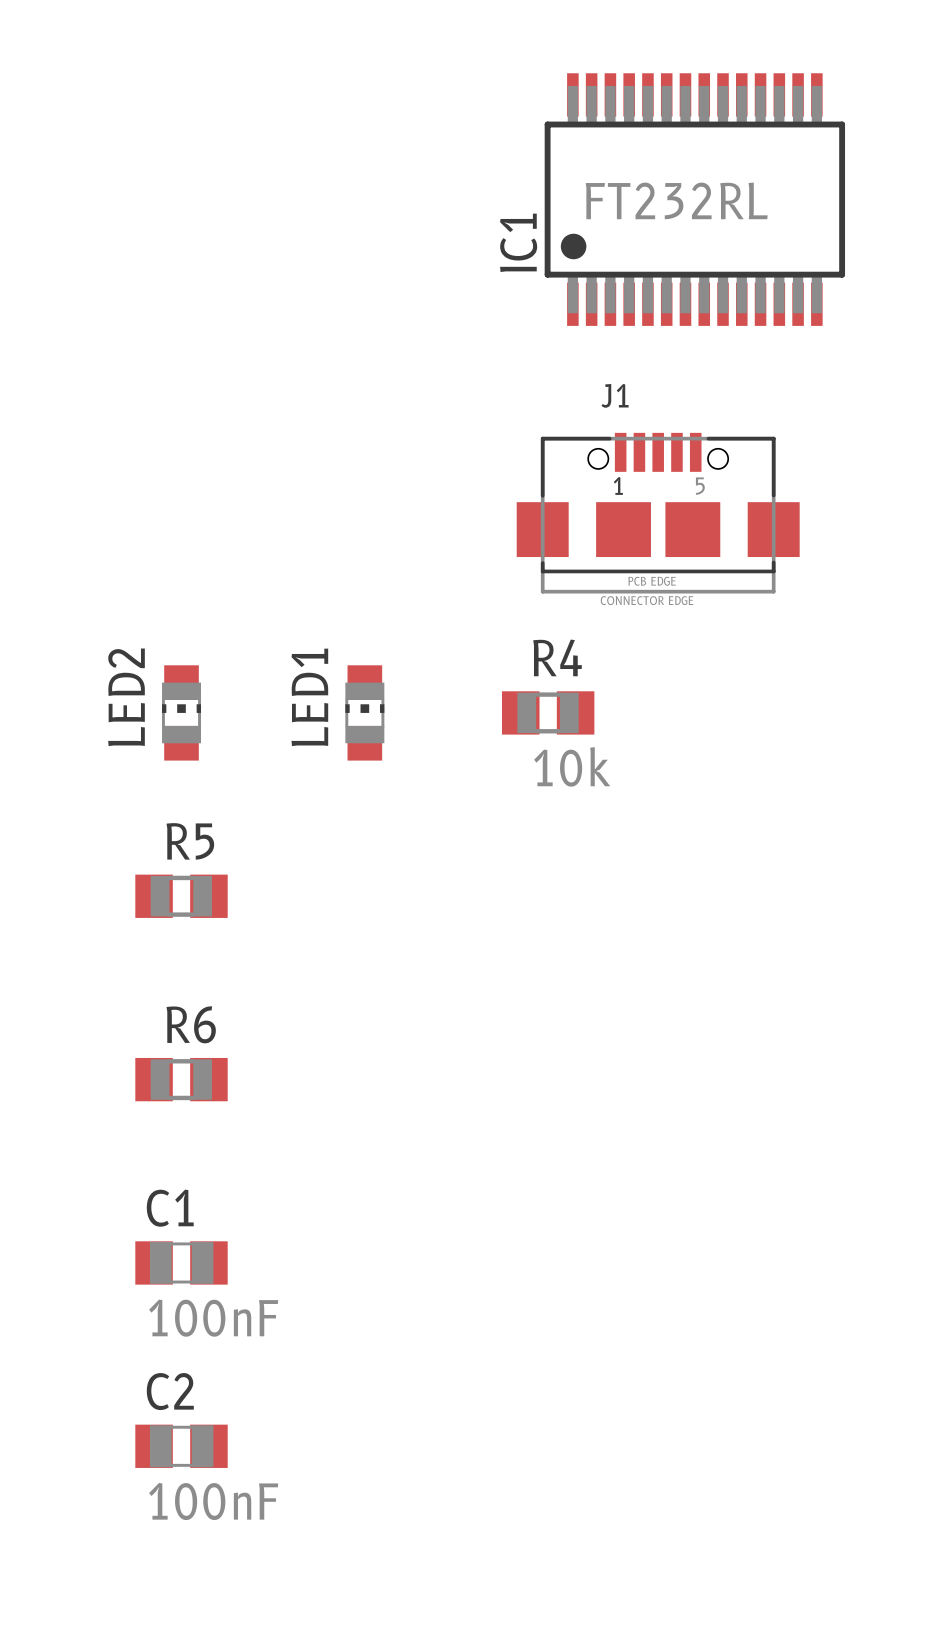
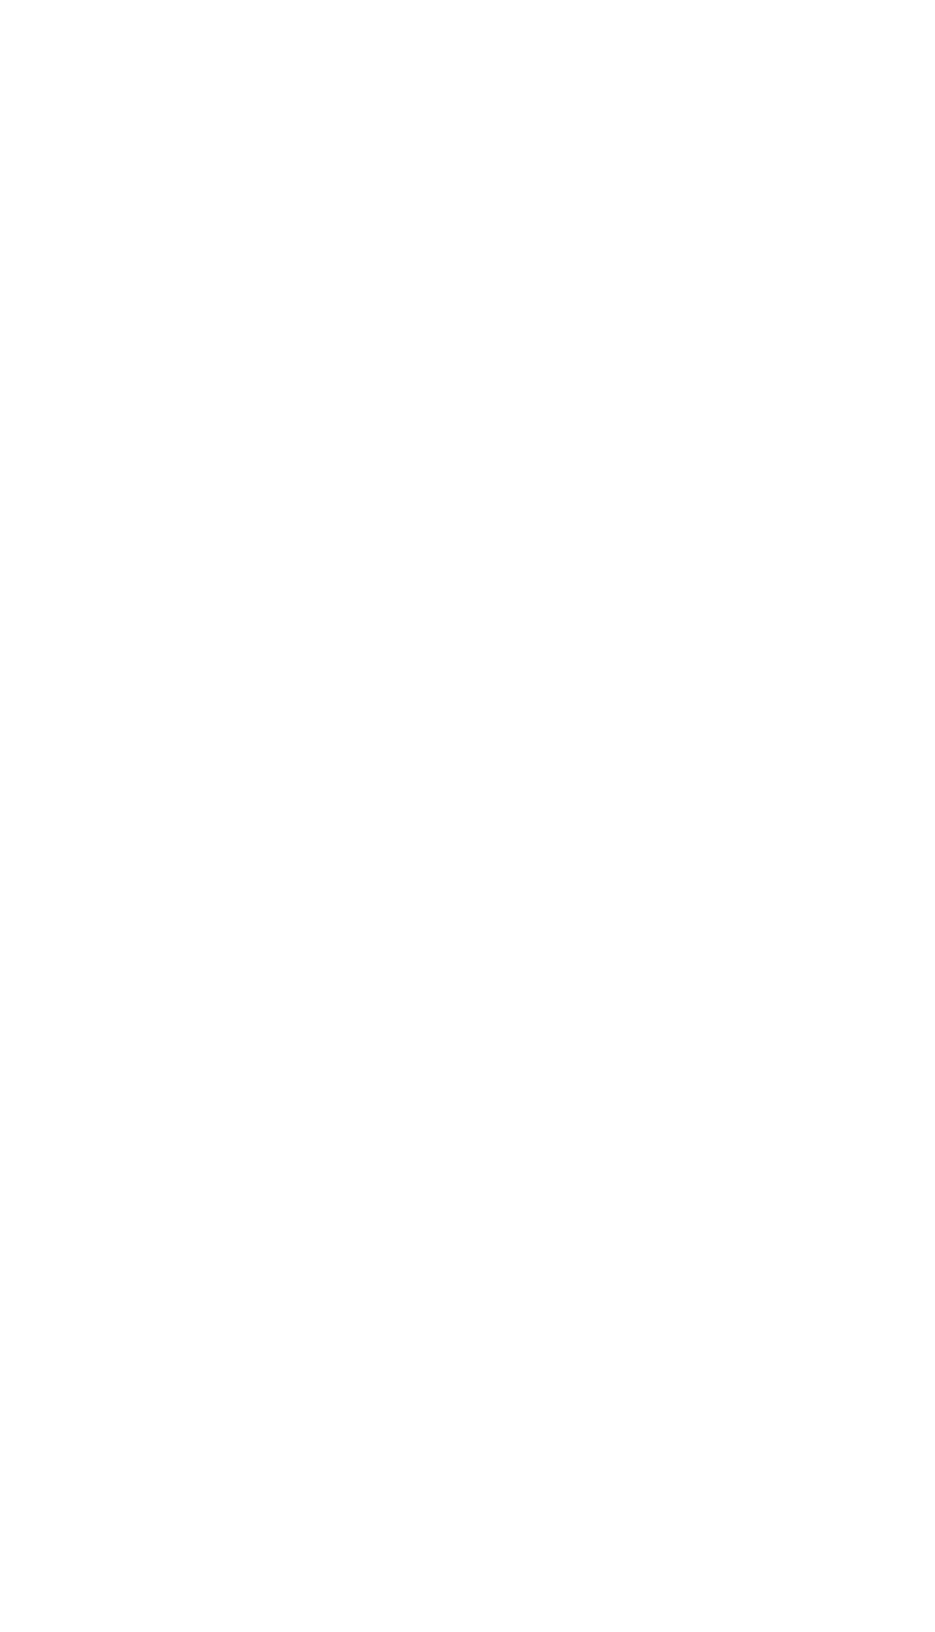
IC1: FT232RL (694, 199) -> none
J1: (658, 513) -> none
LED2: (181, 712) -> none
LED1: (364, 712) -> none
R4: 10k (548, 712) -> none
R5: (181, 896) -> none
R6: (181, 1079) -> none
C1: 100nF (181, 1262) -> none
C2: 100nF (181, 1446) -> none

